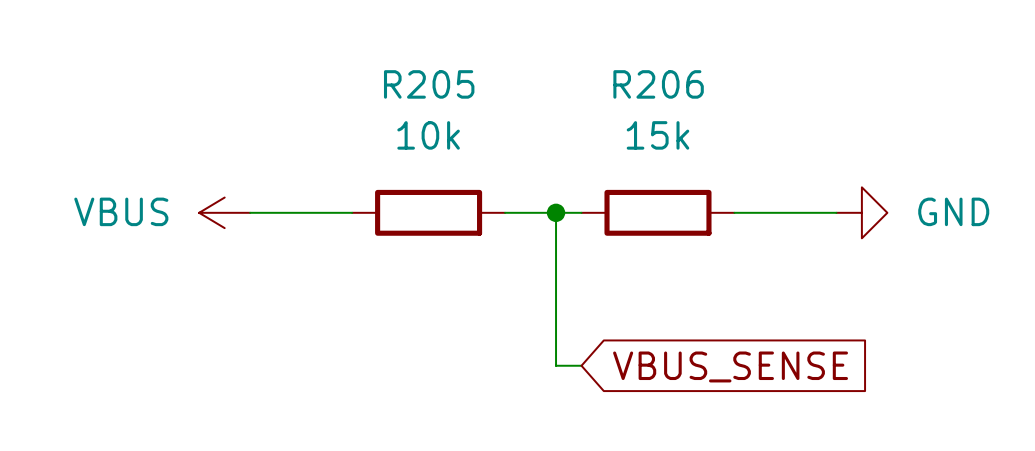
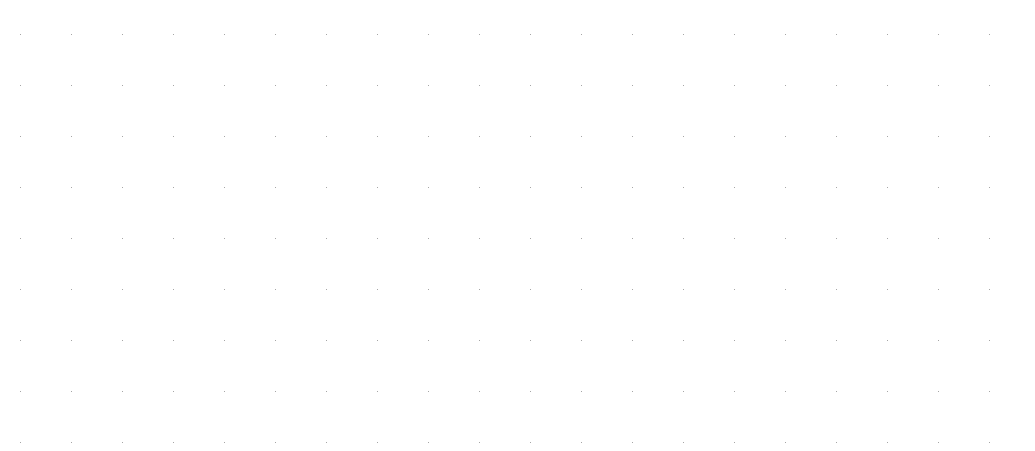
power symbol: VBUS (224, 212) -> none
wire: (250, 212) (352, 212) -> none
R205: 10k (428, 212) -> none
wire: (505, 212) (581, 212) -> none
wire: (556, 212) (556, 365) (581, 365) -> none
junction: (556, 212) -> none
R206: 15k (657, 212) -> none
wire: (734, 212) (836, 212) -> none
power symbol: GND (861, 212) -> none
global label: VBUS_SENSE (730, 366) -> none

